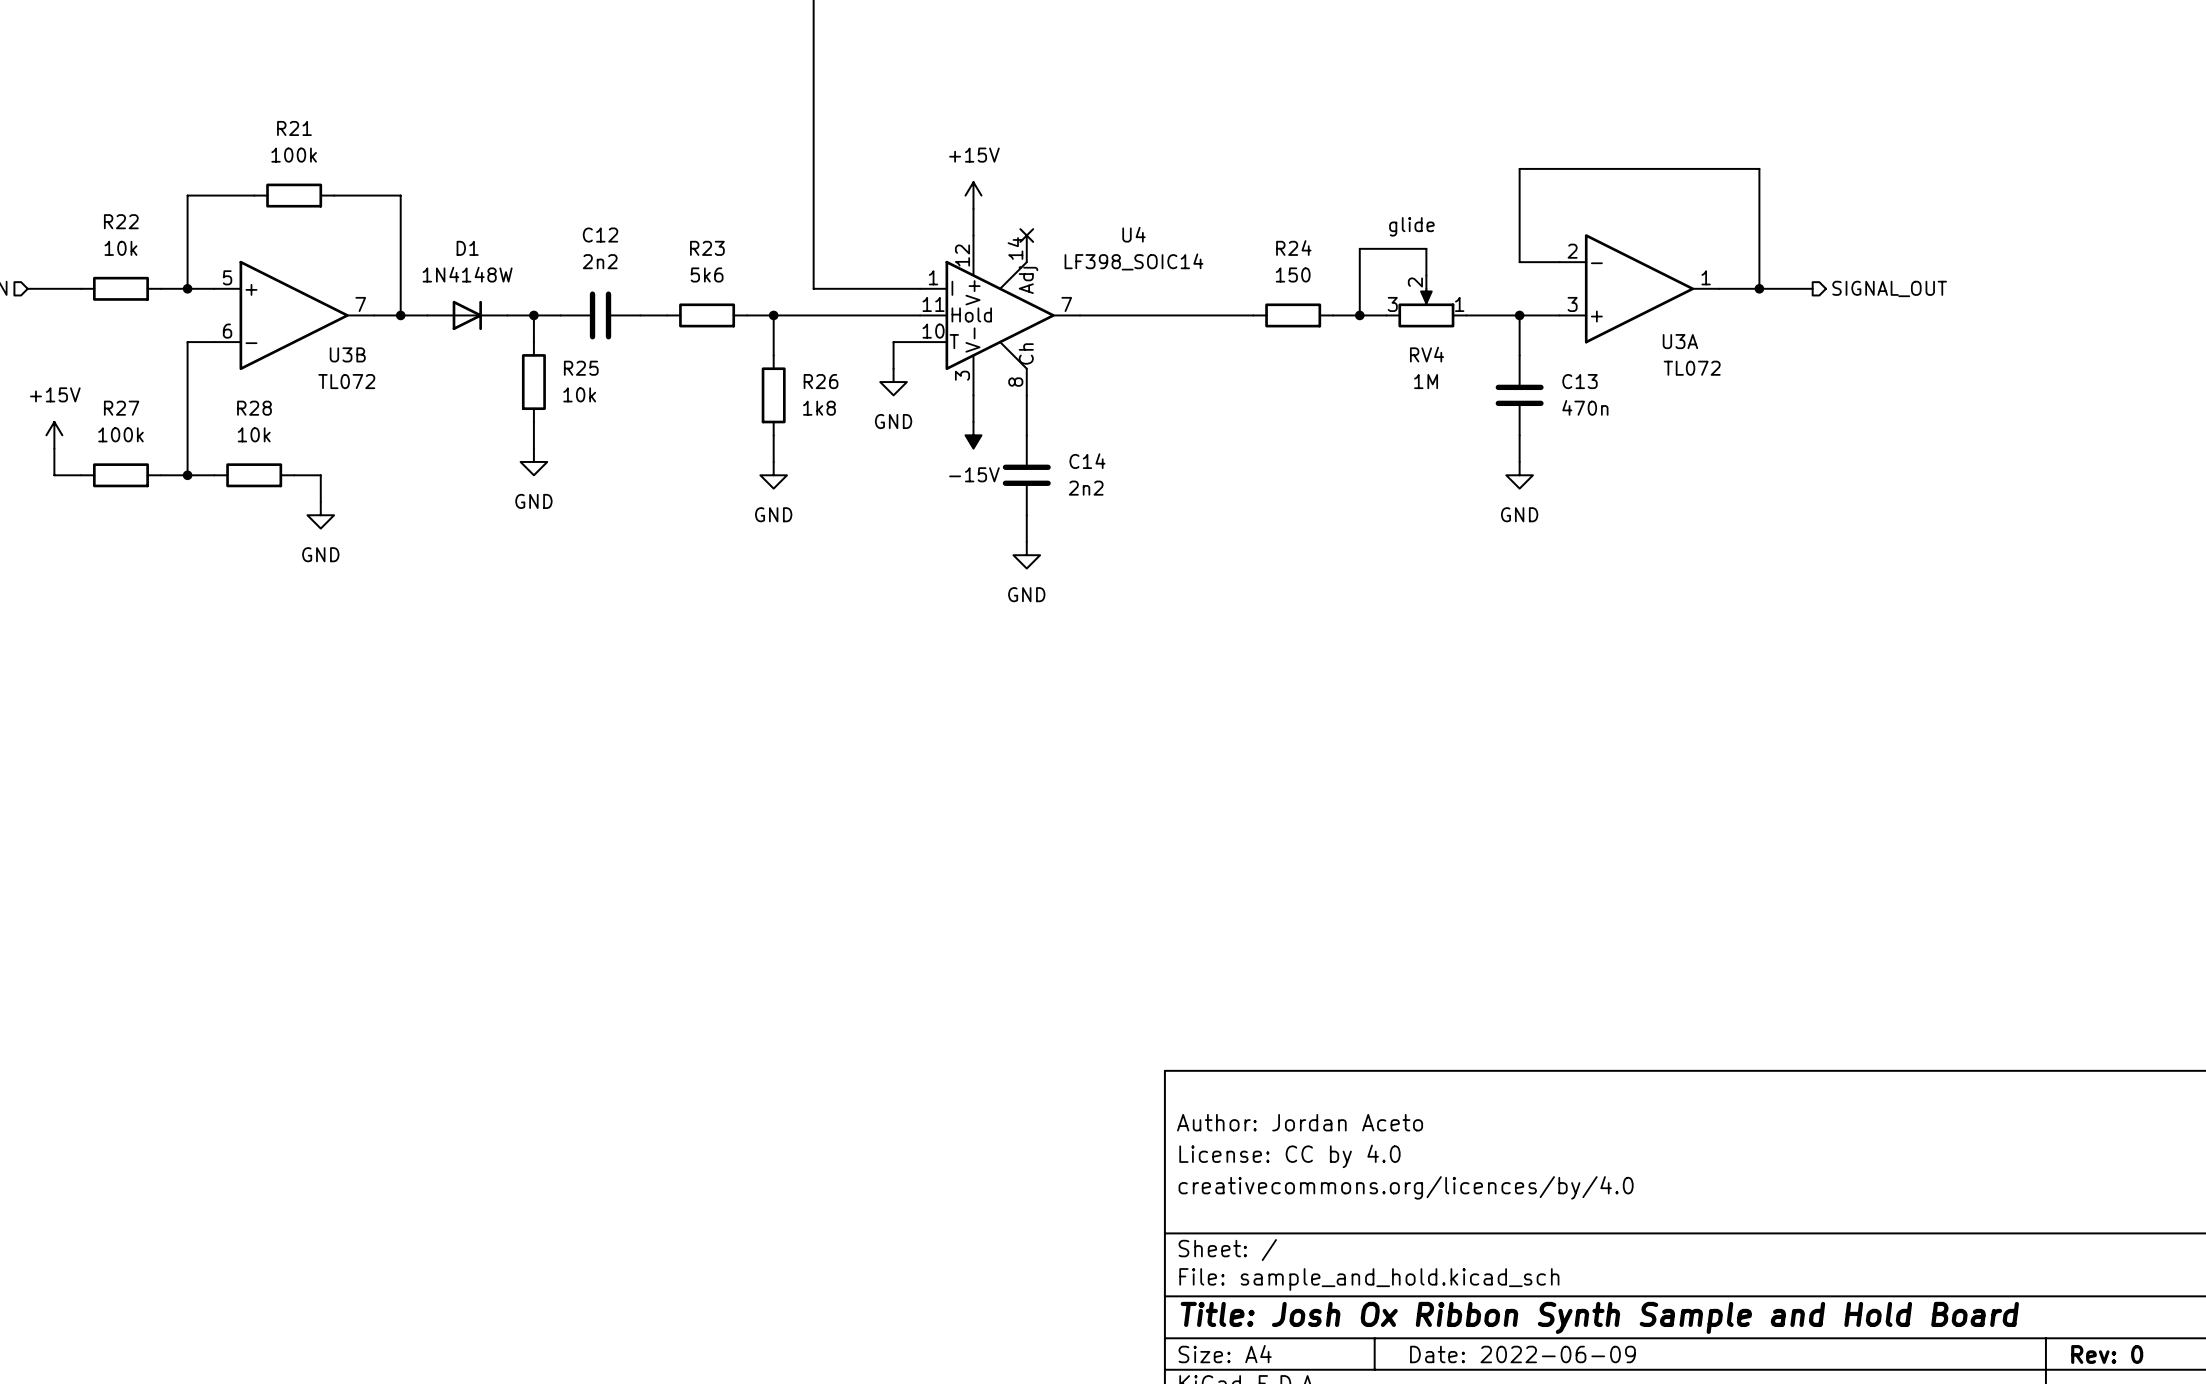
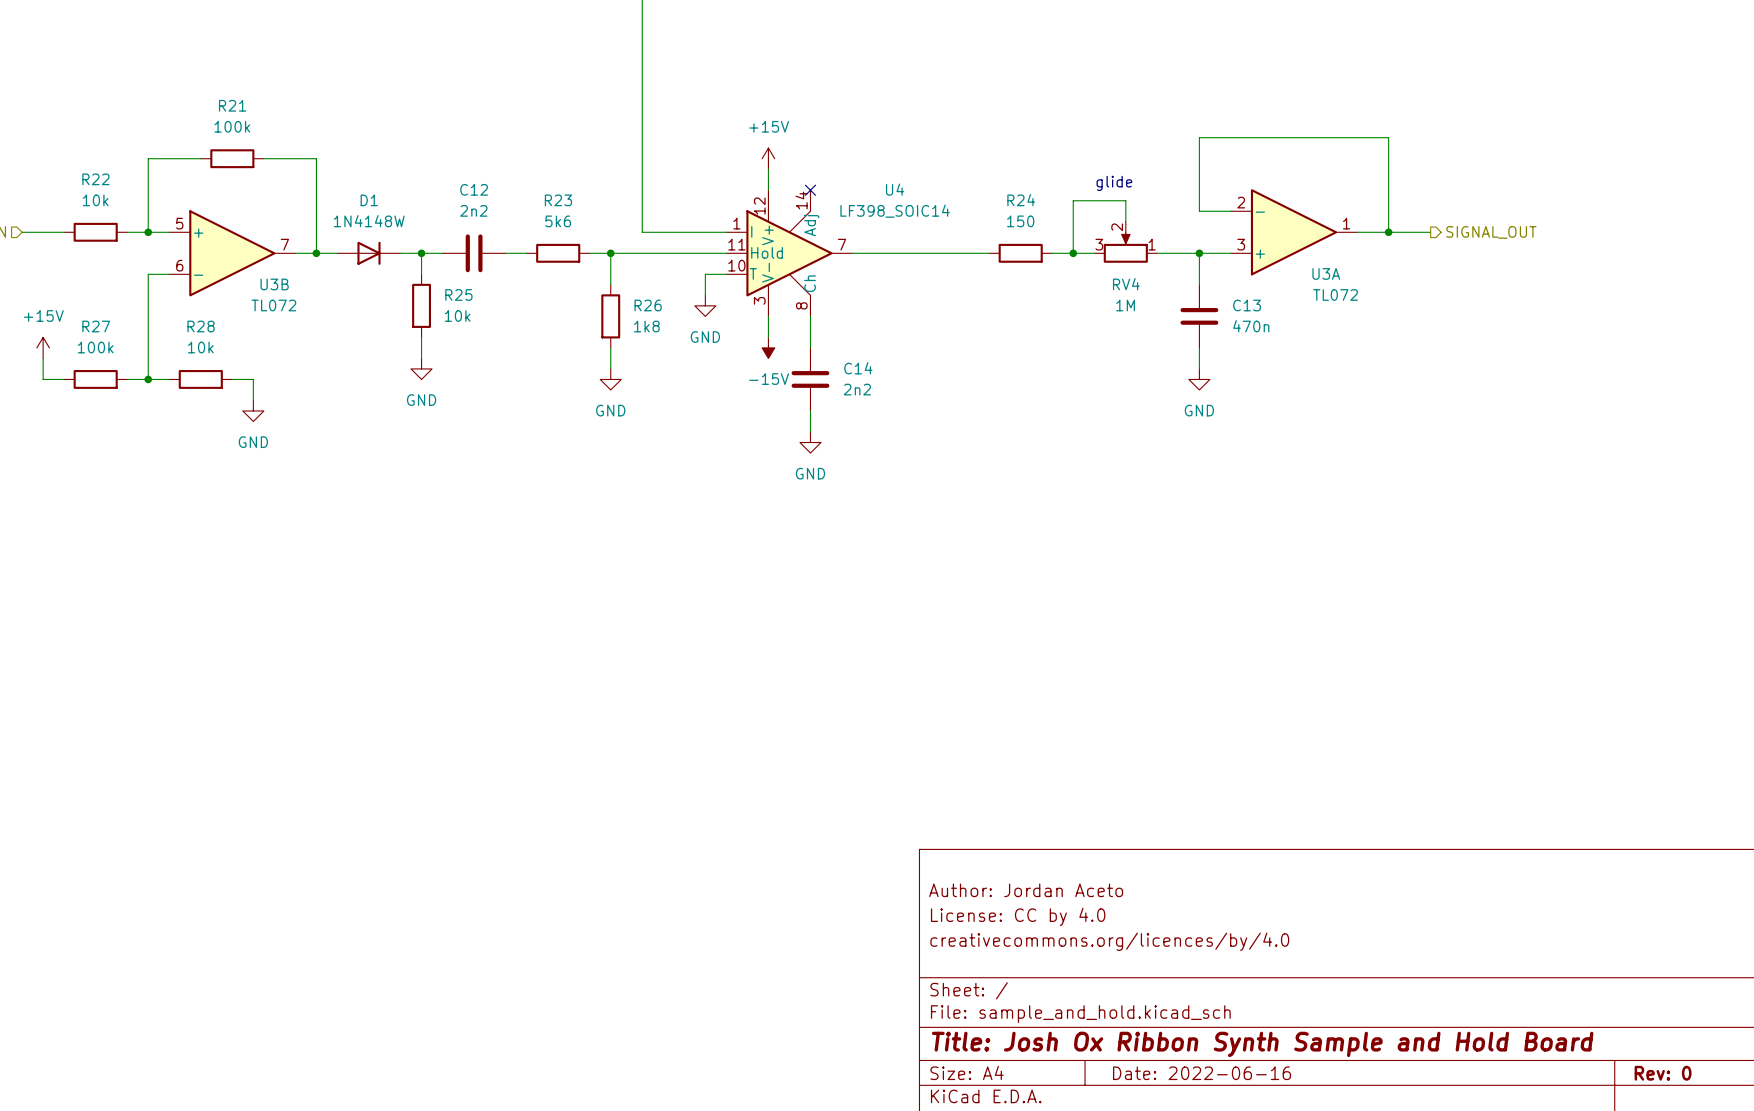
title block: Date: 2022-06-09 (1522, 1354) -> Date: 2022-06-16 (1202, 1073)

